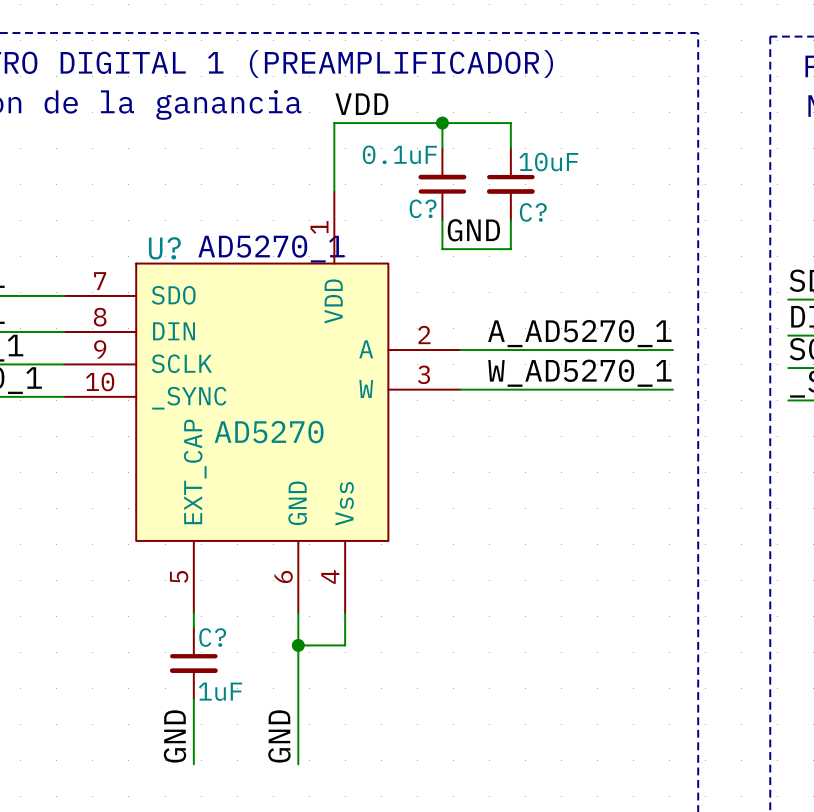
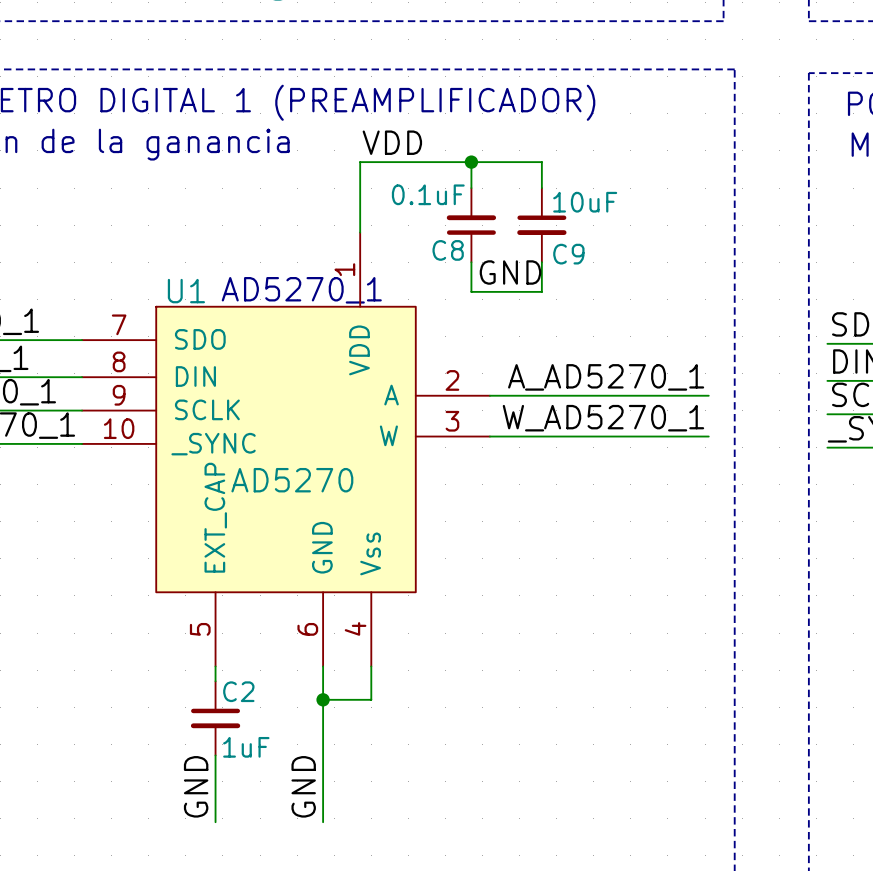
C? name: C? (423, 208) -> C8 (448, 250)
C? name: C? (533, 212) -> C9 (568, 254)
U? name: U? (164, 248) -> U1 (186, 291)
C? name: C? (212, 637) -> C2 (238, 691)

